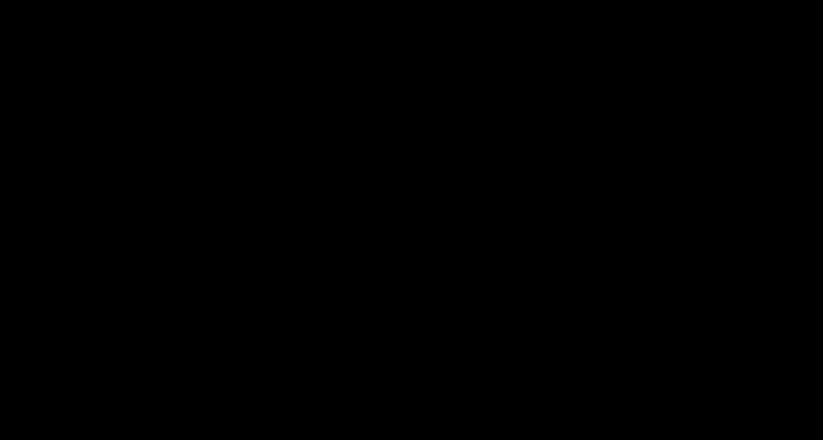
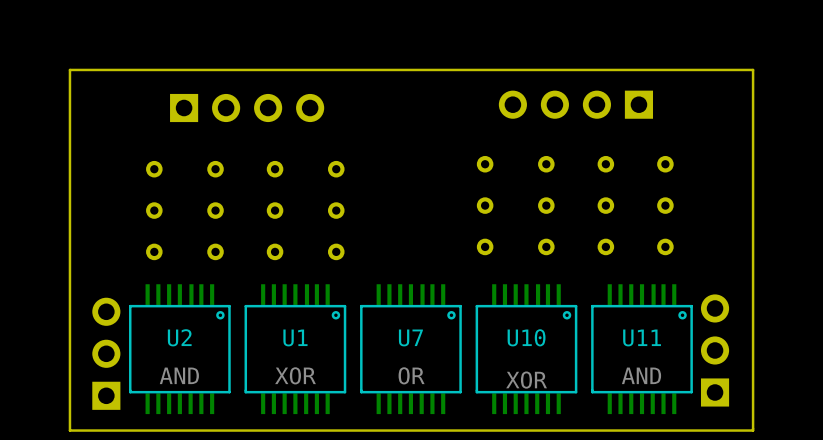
board edge: none -> (753, 69) (753, 430) (69, 430) (69, 69) (753, 69)
part: none -> (575, 104)
part: none -> (247, 108)
part: none -> (485, 205)
part: none -> (546, 205)
part: none -> (605, 205)
part: none -> (665, 205)
part: none -> (154, 210)
part: none -> (215, 210)
part: none -> (275, 210)
part: none -> (336, 210)
U2: none -> AND (179, 349)
U1: none -> XOR (295, 349)
U7: none -> OR (410, 349)
U10: none -> XOR (526, 349)
U11: none -> AND (642, 349)
part: none -> (715, 350)
part: none -> (106, 353)

